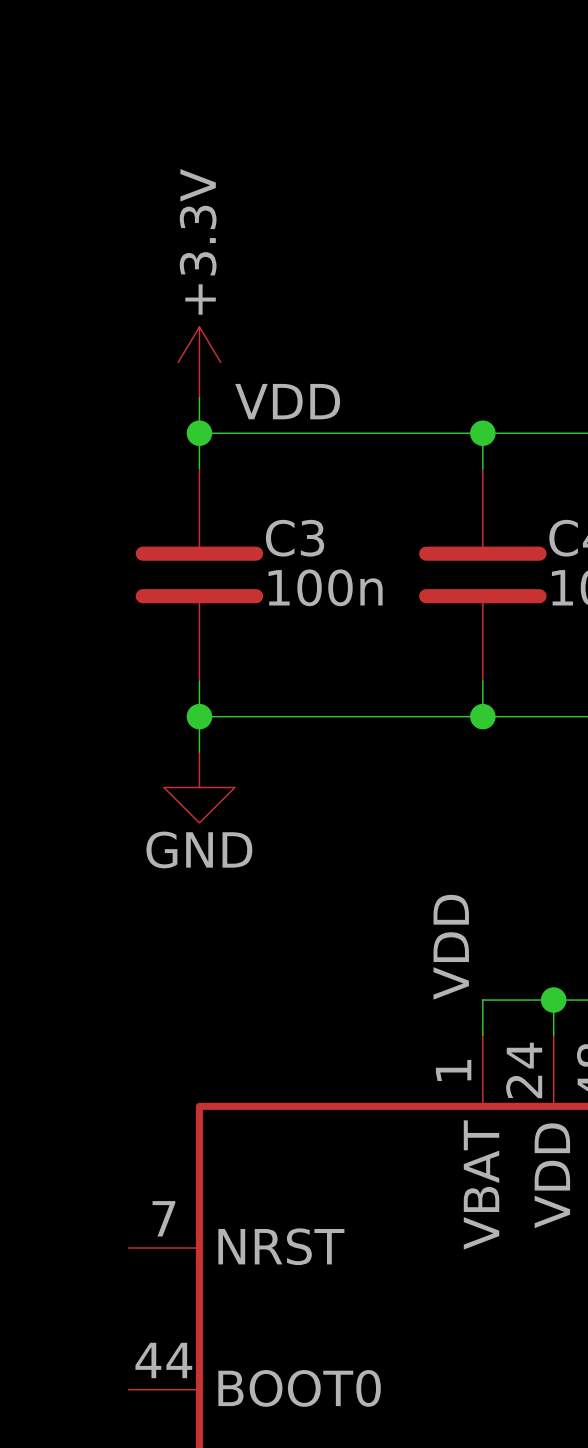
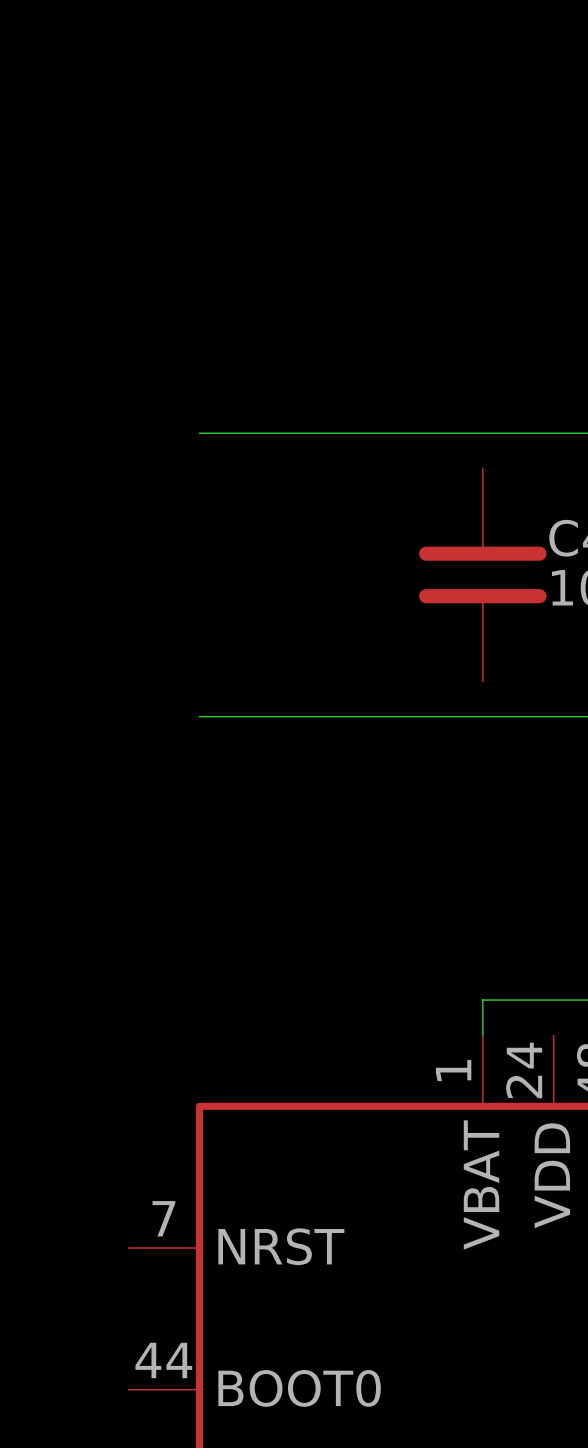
power symbol: +3.3V (199, 362) -> none
wire: (199, 397) (199, 468) -> none
label: VDD (287, 401) -> none
junction: (199, 433) -> none
wire: (482, 433) (482, 468) -> none
junction: (482, 433) -> none
C3: 100n (199, 574) -> none
wire: (199, 681) (199, 752) -> none
wire: (482, 681) (482, 716) -> none
junction: (199, 716) -> none
junction: (482, 716) -> none
power symbol: GND (199, 787) -> none
label: VDD (451, 947) -> none
wire: (553, 1000) (553, 1035) -> none
junction: (553, 1000) -> none

